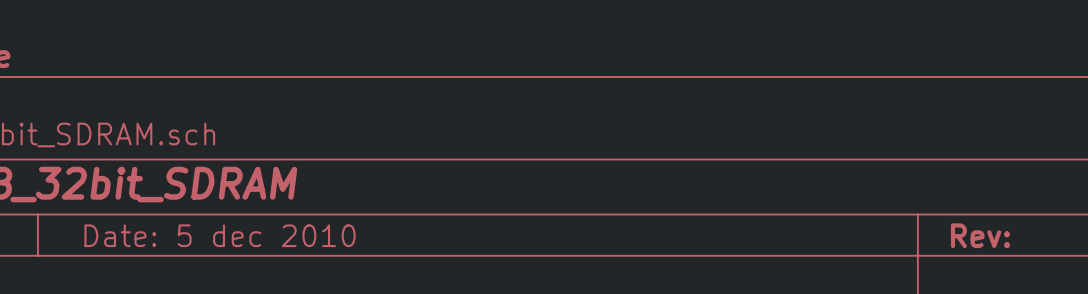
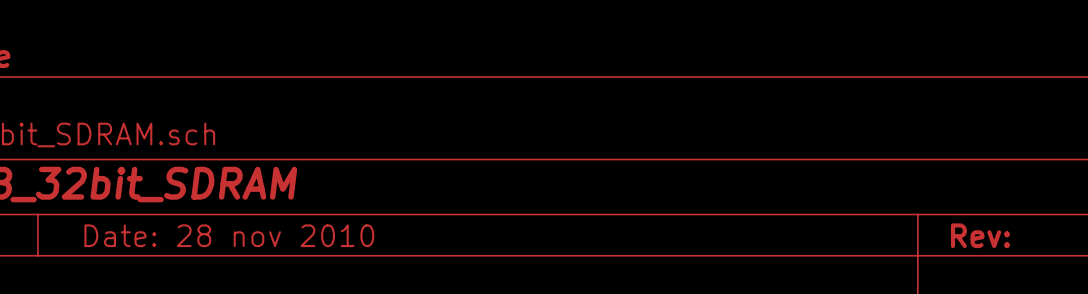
title block: Date: 5 dec 2010 (220, 235) -> Date: 28 nov 2010 (229, 235)

